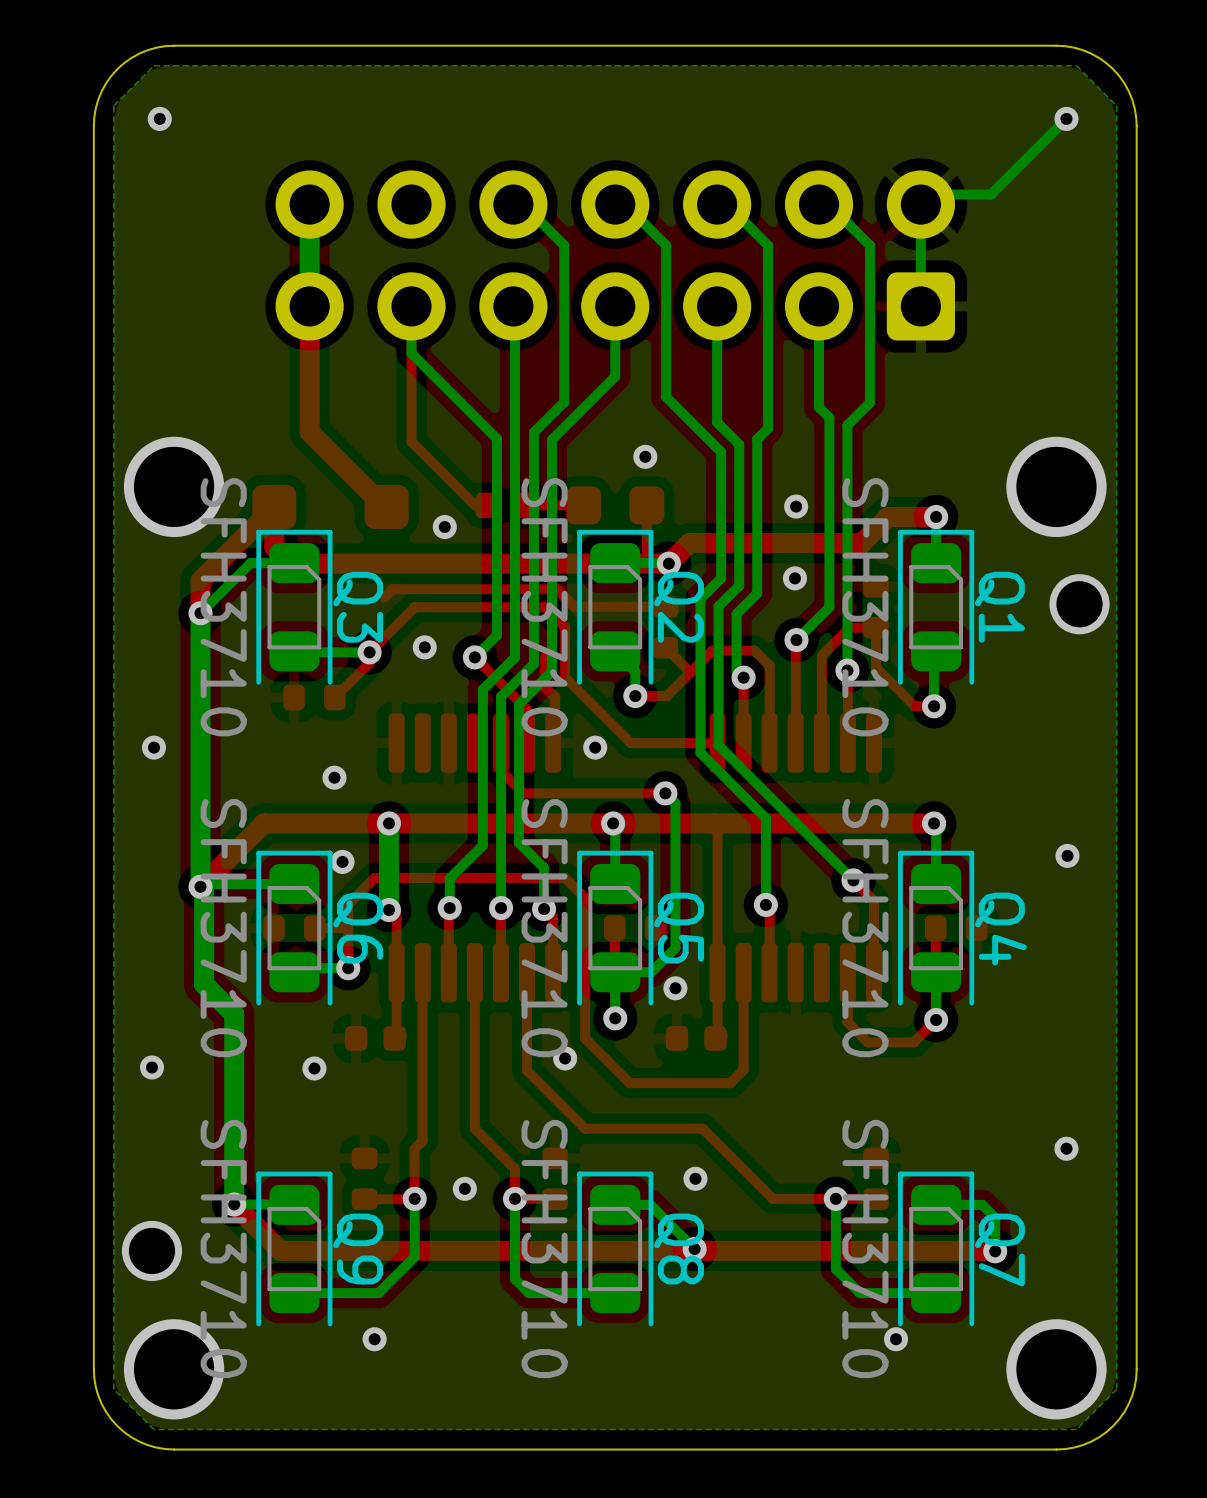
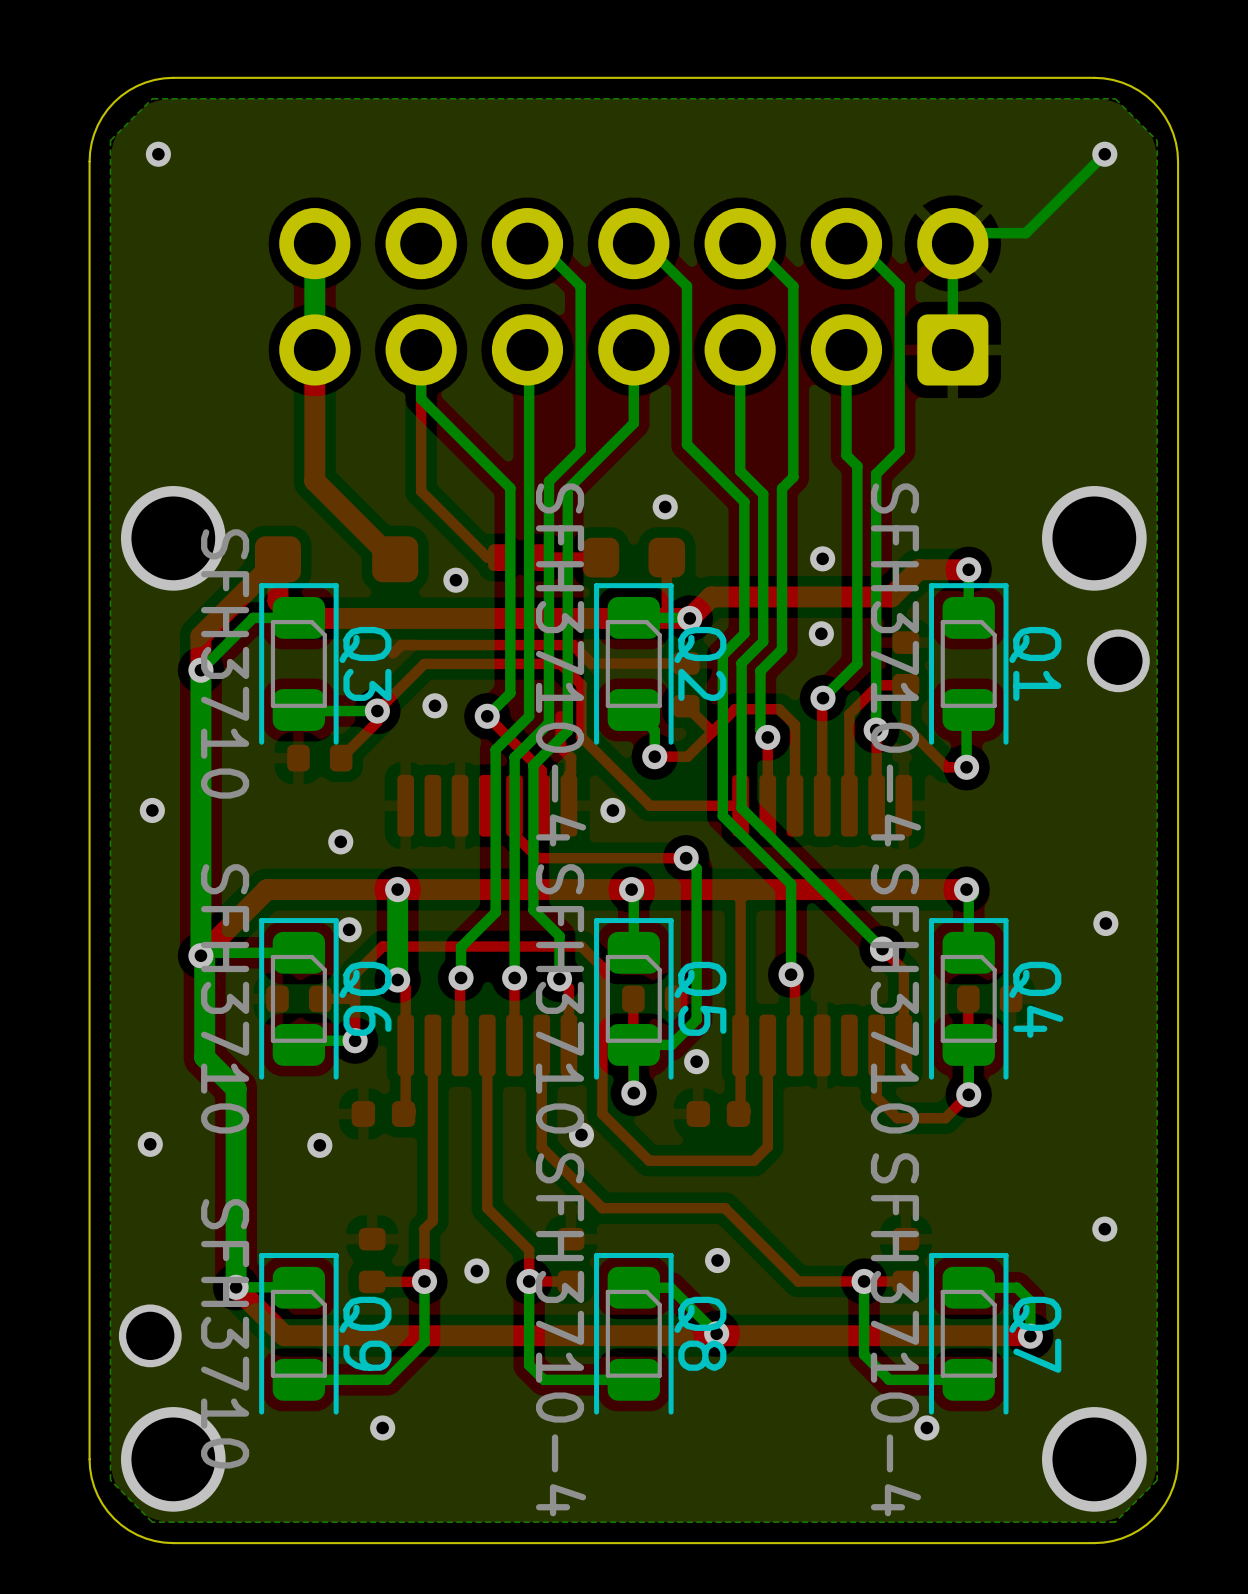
Q2 value: SFH3710 (544, 607) -> SFH3710-4 (561, 664)
Q1 value: SFH3710 (865, 607) -> SFH3710-4 (895, 664)
Q8 value: SFH3710 (544, 1248) -> SFH3710-4 (561, 1334)
Q7 value: SFH3710 (865, 1248) -> SFH3710-4 (895, 1334)

